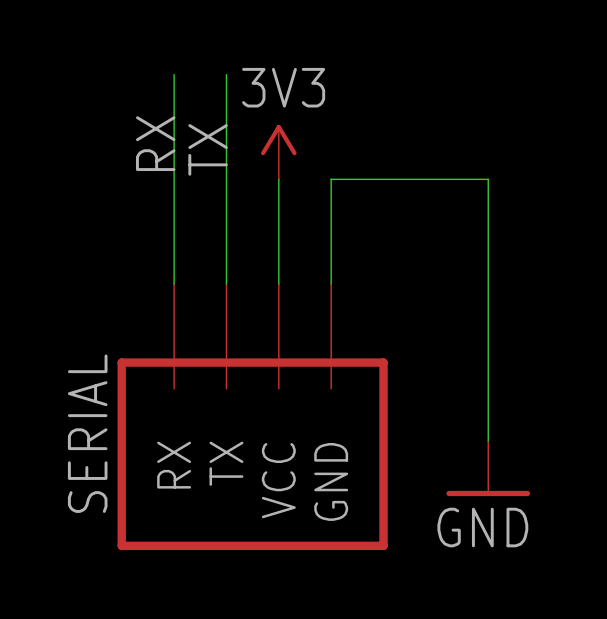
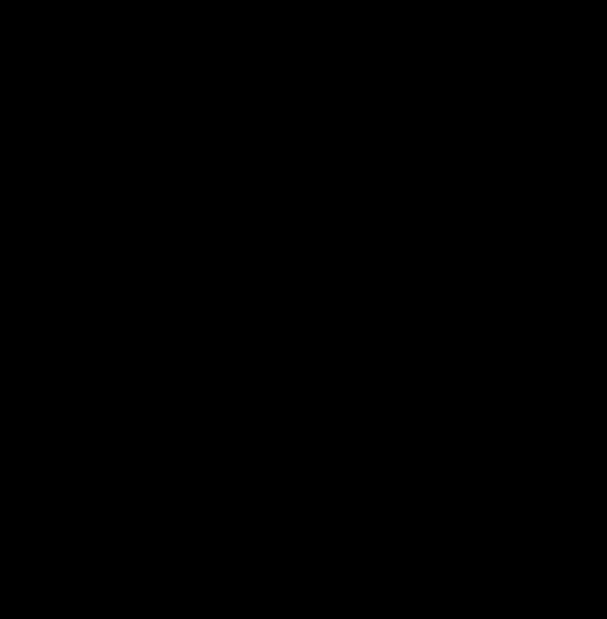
wire: (174, 74) (174, 284) -> none
wire: (226, 74) (226, 284) -> none
label: RX (155, 143) -> none
label: TX (208, 149) -> none
power symbol: 3V3 (278, 152) -> none
wire: (278, 179) (278, 284) -> none
wire: (331, 284) (331, 179) (488, 179) (488, 441) -> none
SERIAL: (252, 417) -> none
power symbol: GND (488, 468) -> none

